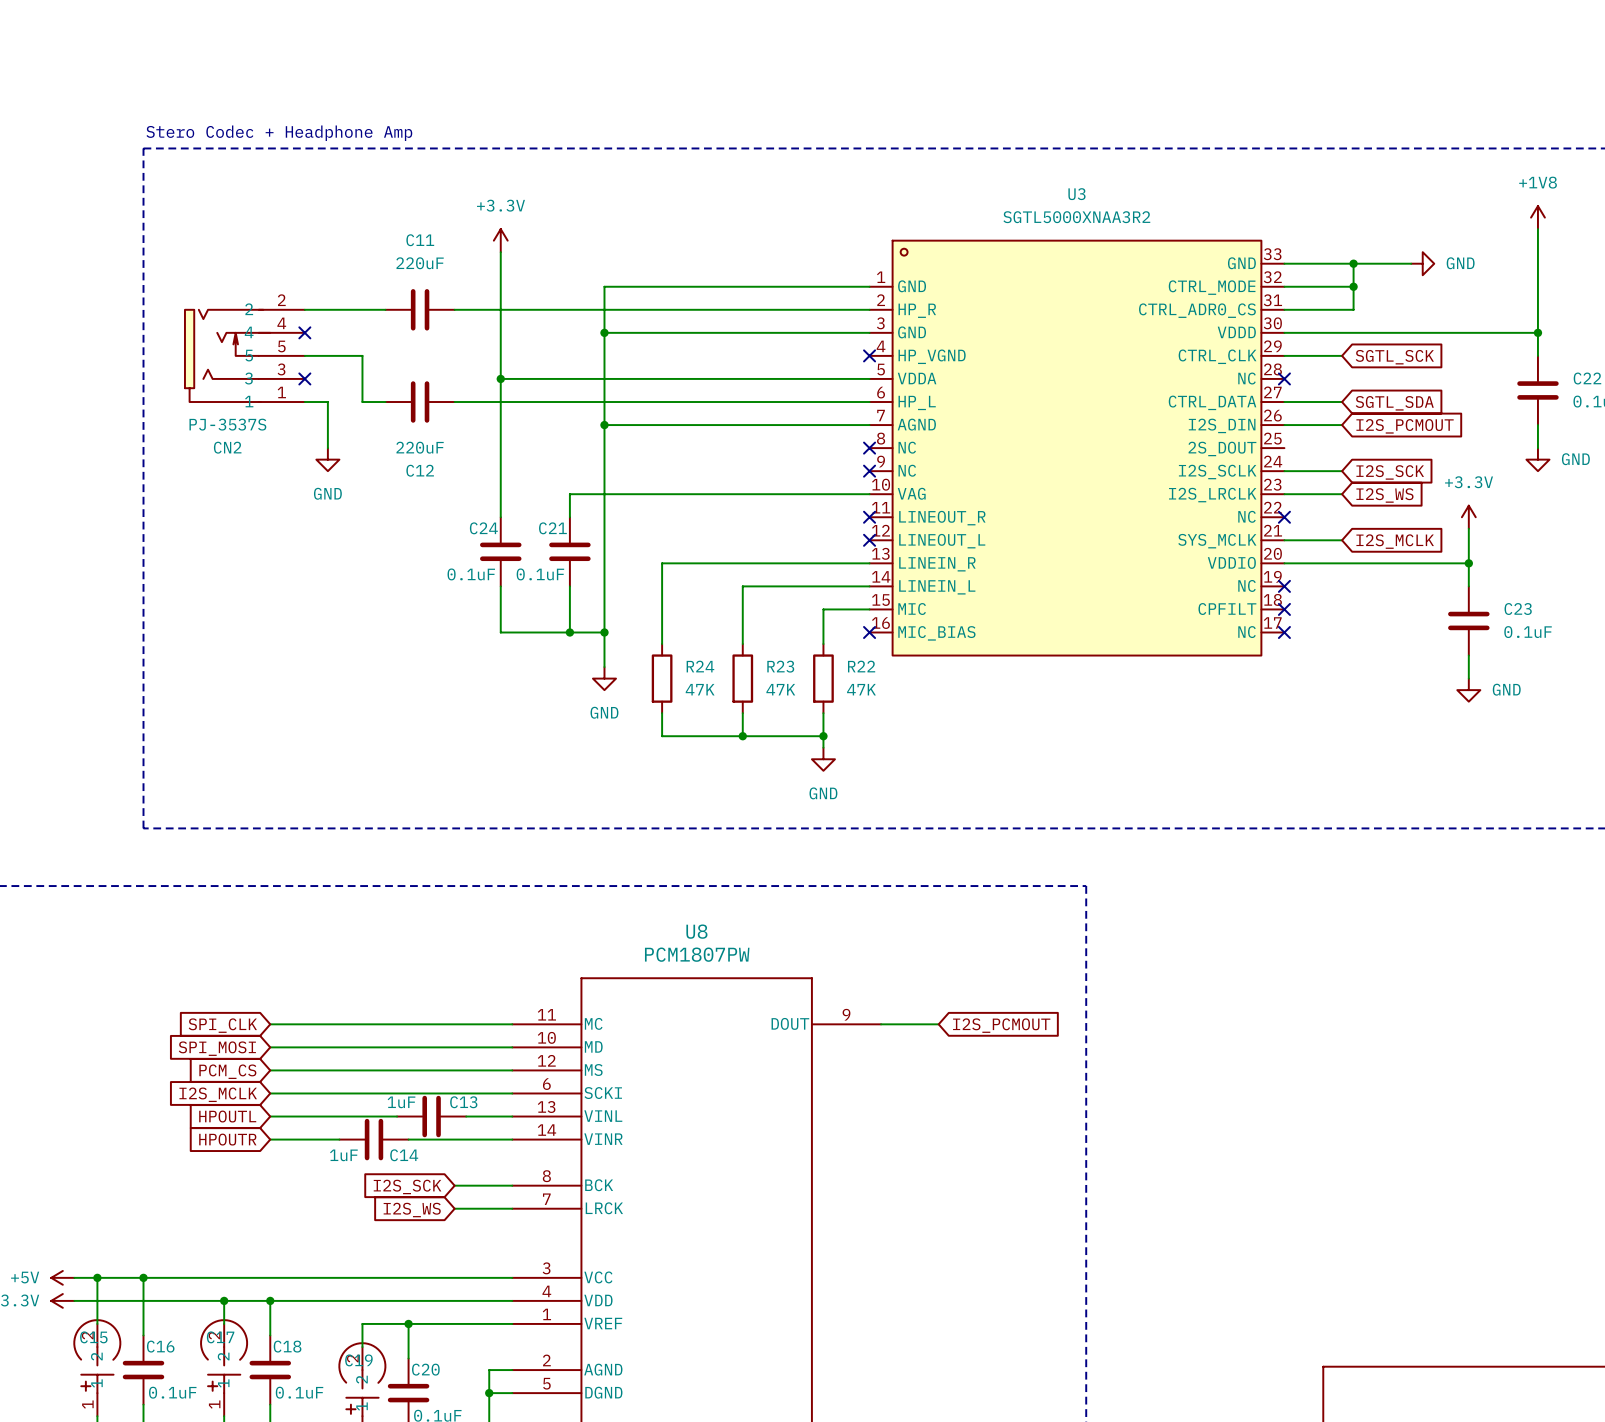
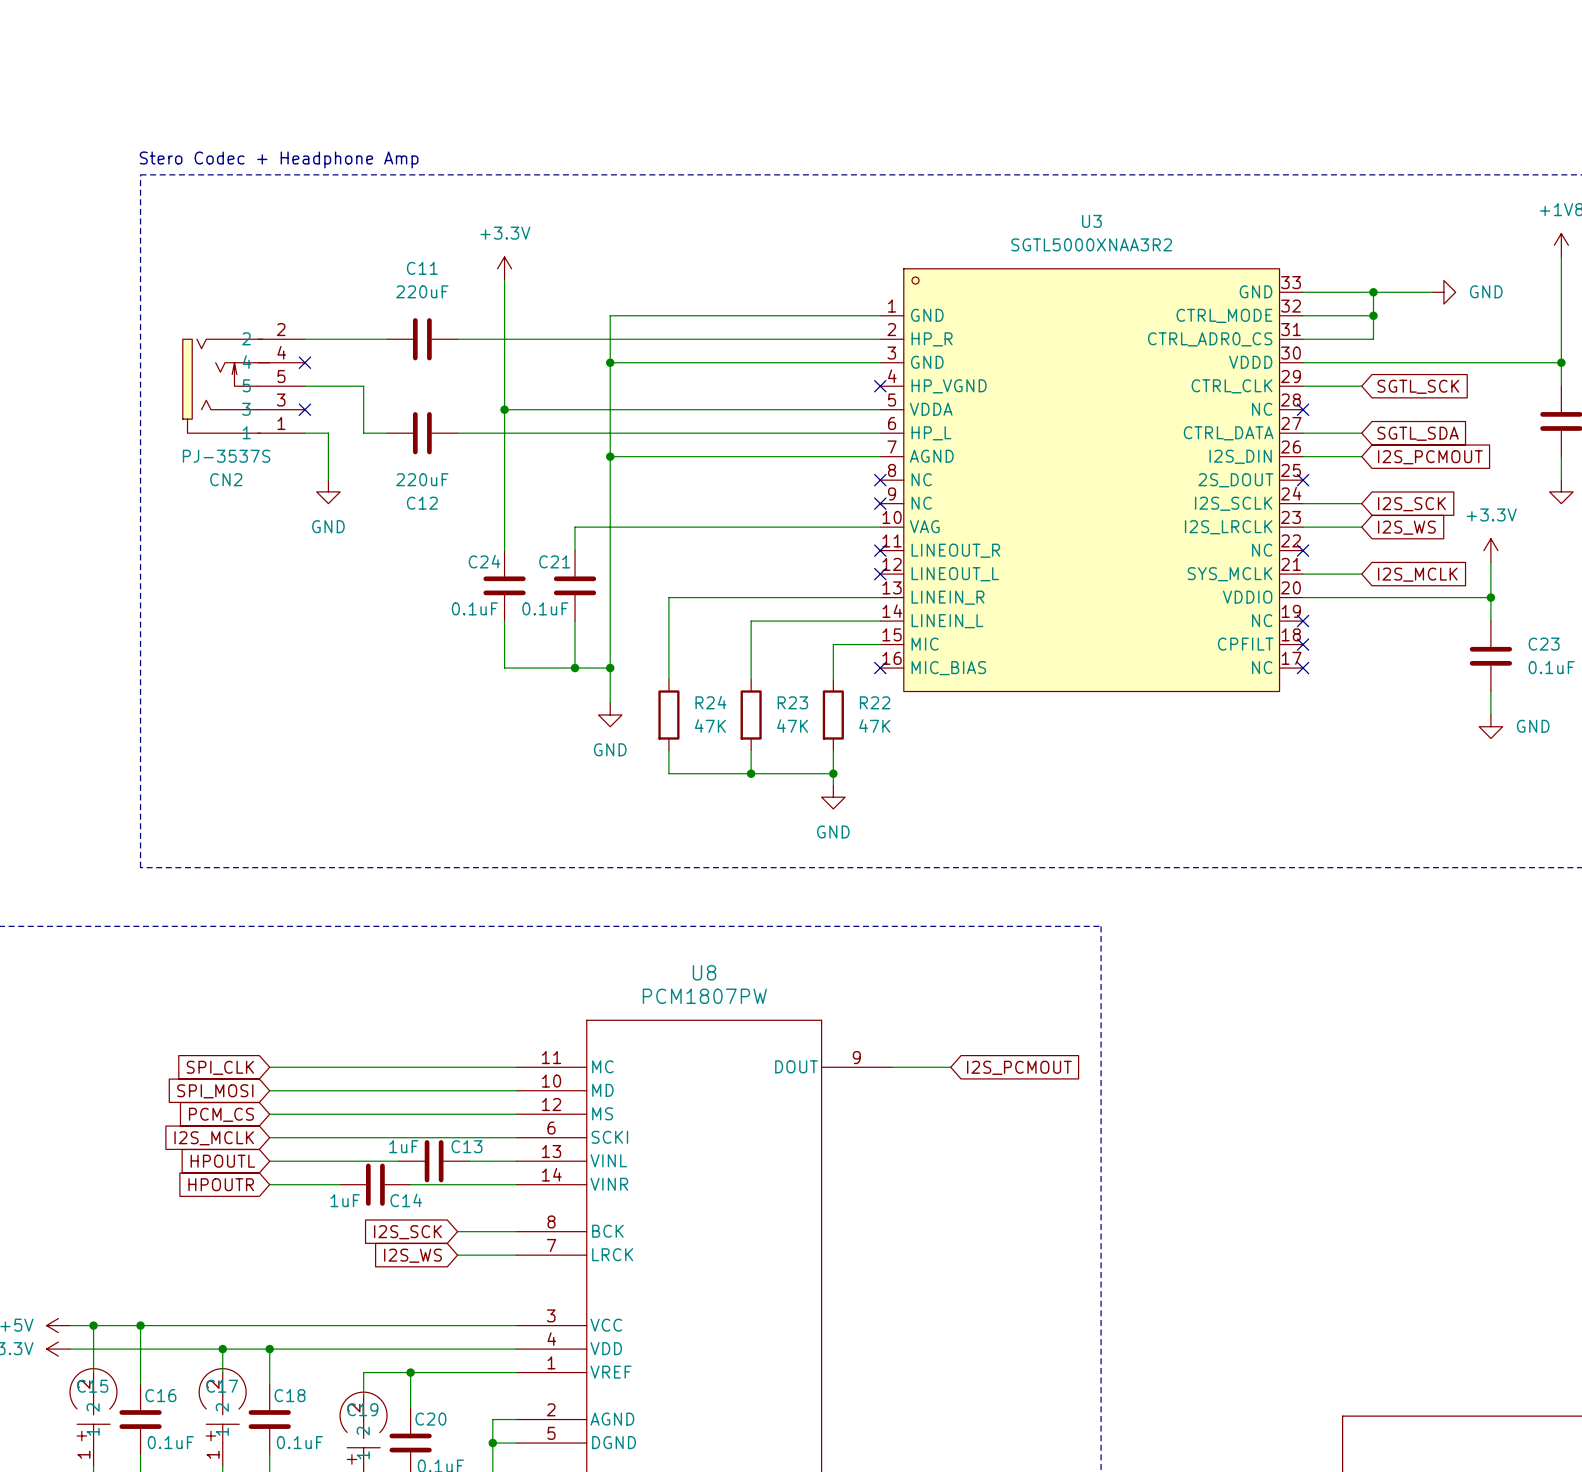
no-connect mark: none -> (1303, 480)

